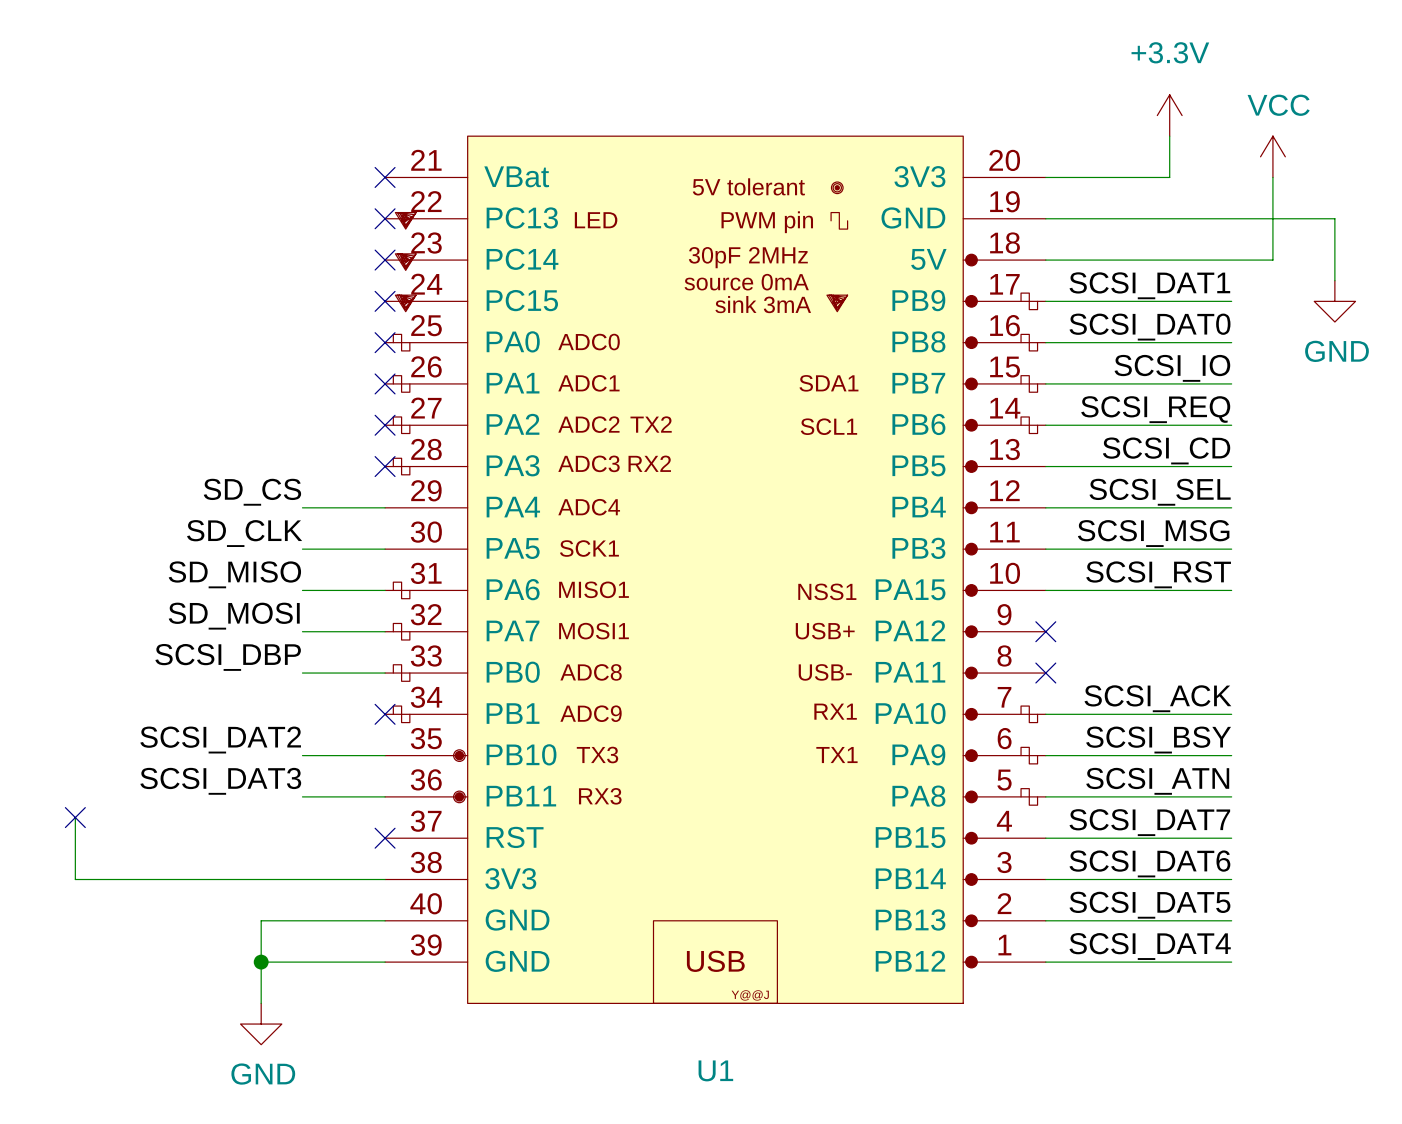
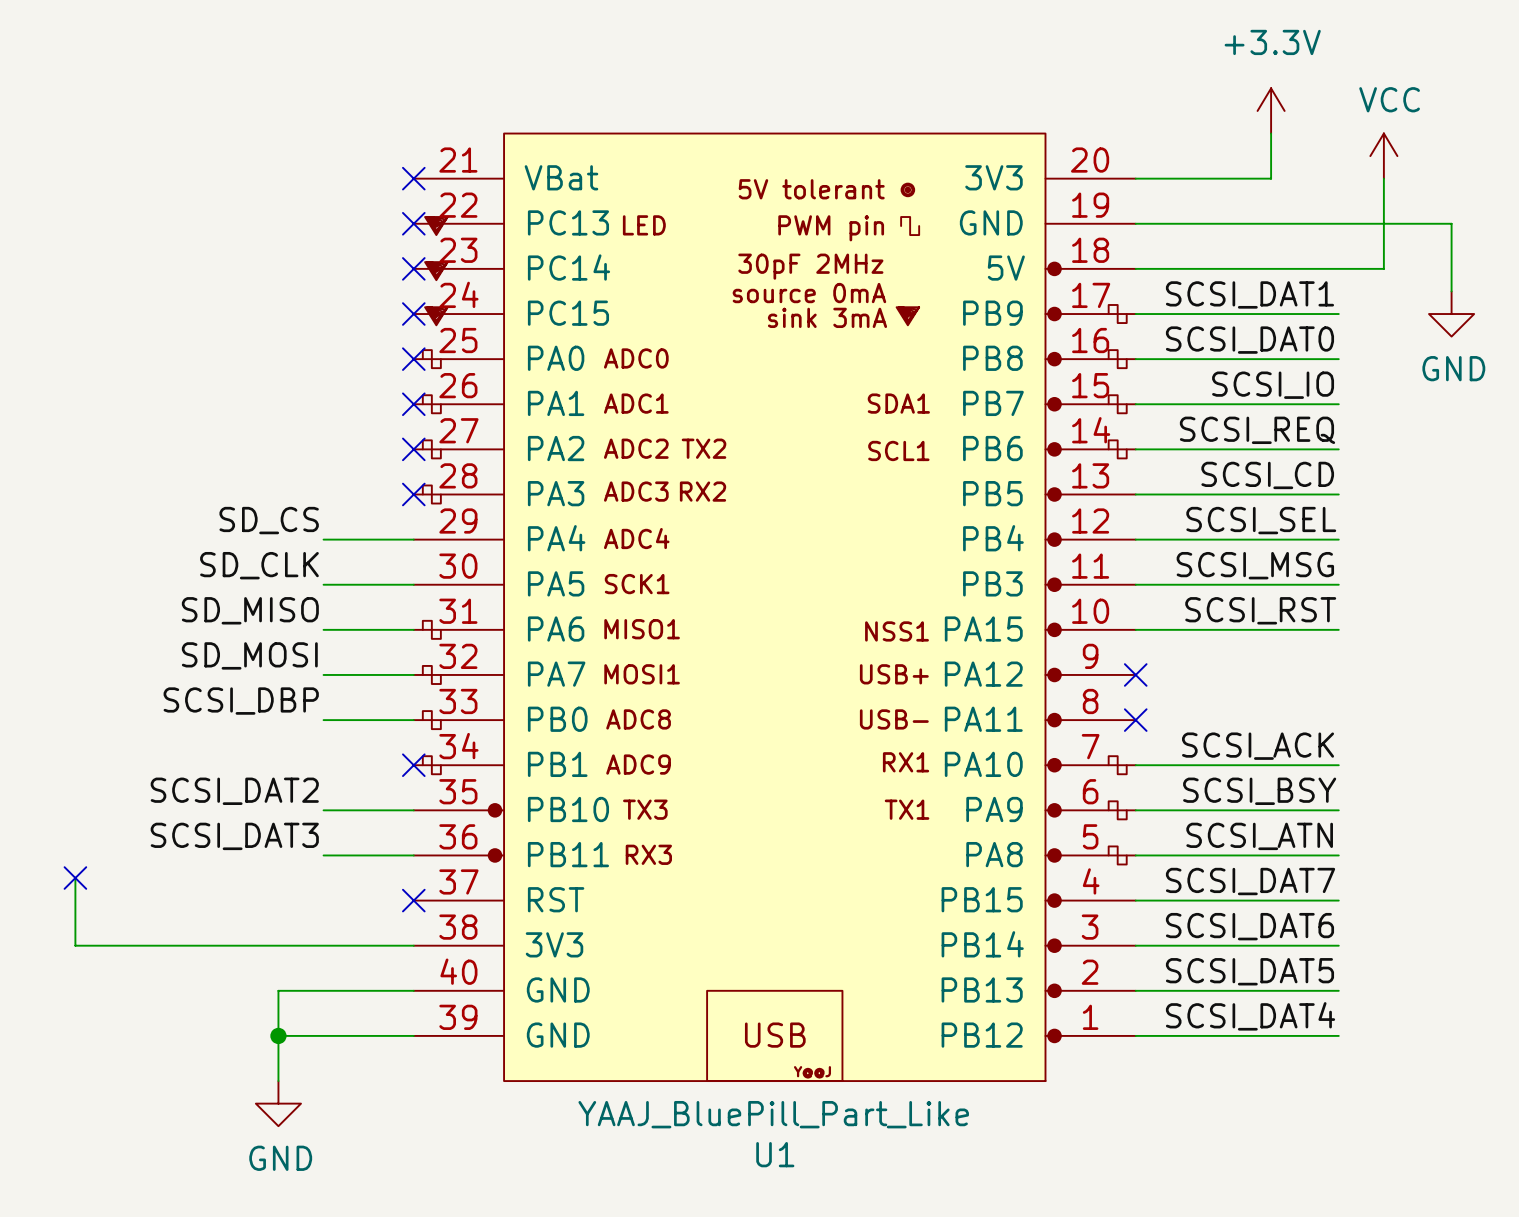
U1 value: none -> YAAJ_BluePill_Part_Like (773, 1114)

